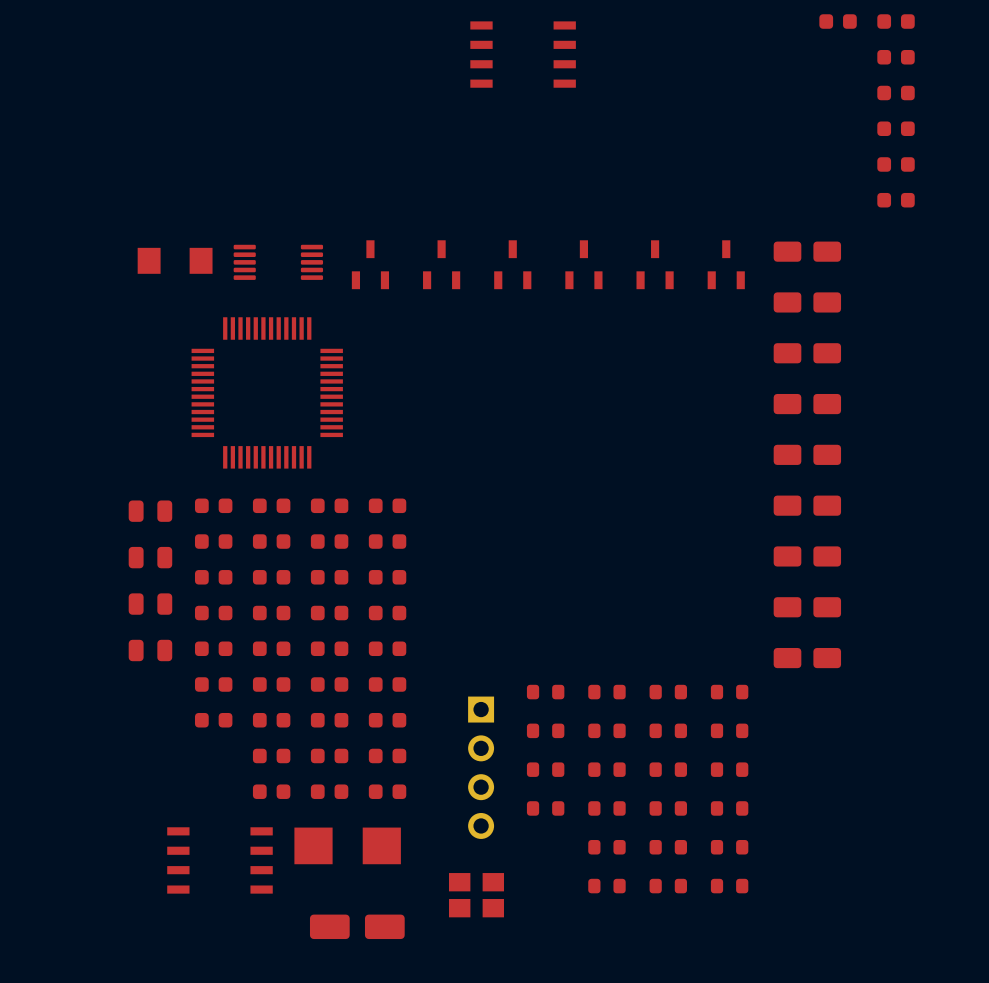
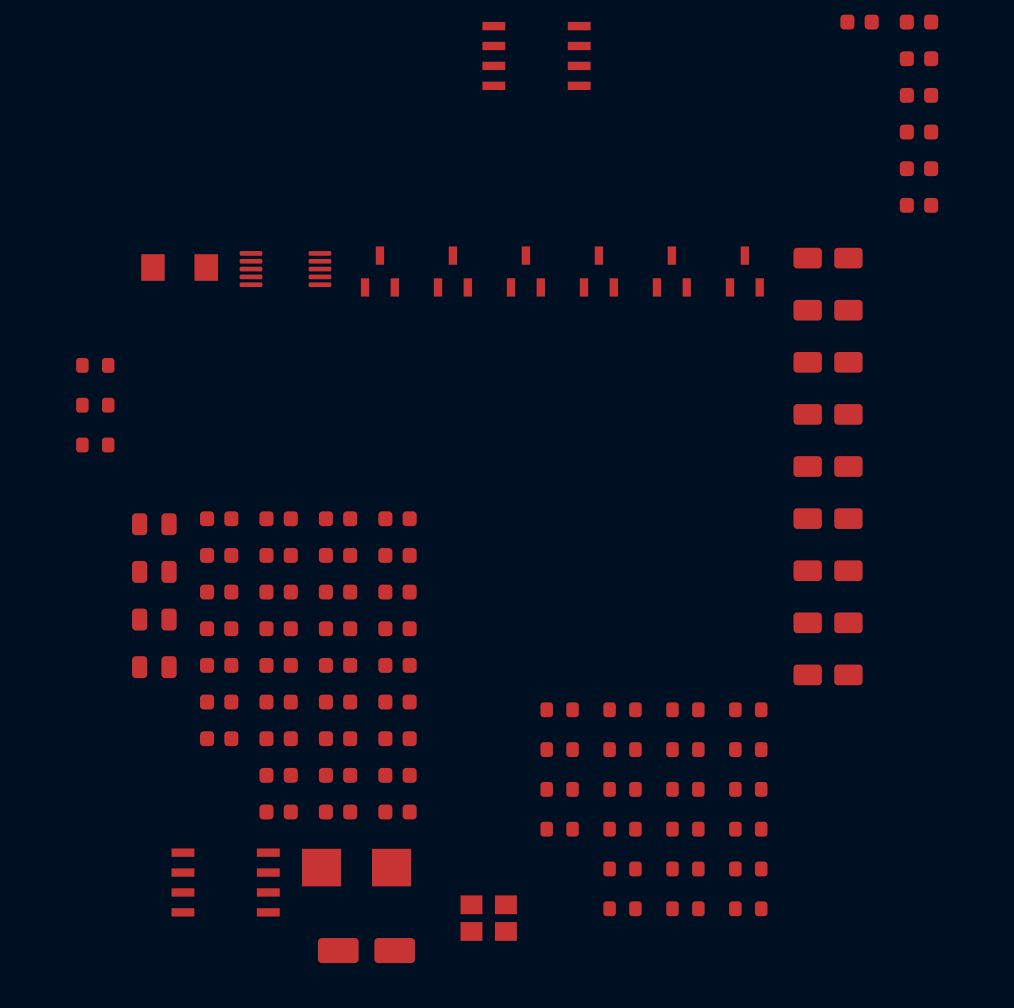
part: none -> (95, 365)
part: (267, 392) -> none
part: none -> (95, 405)
part: none -> (95, 444)
part: (481, 767) -> none

